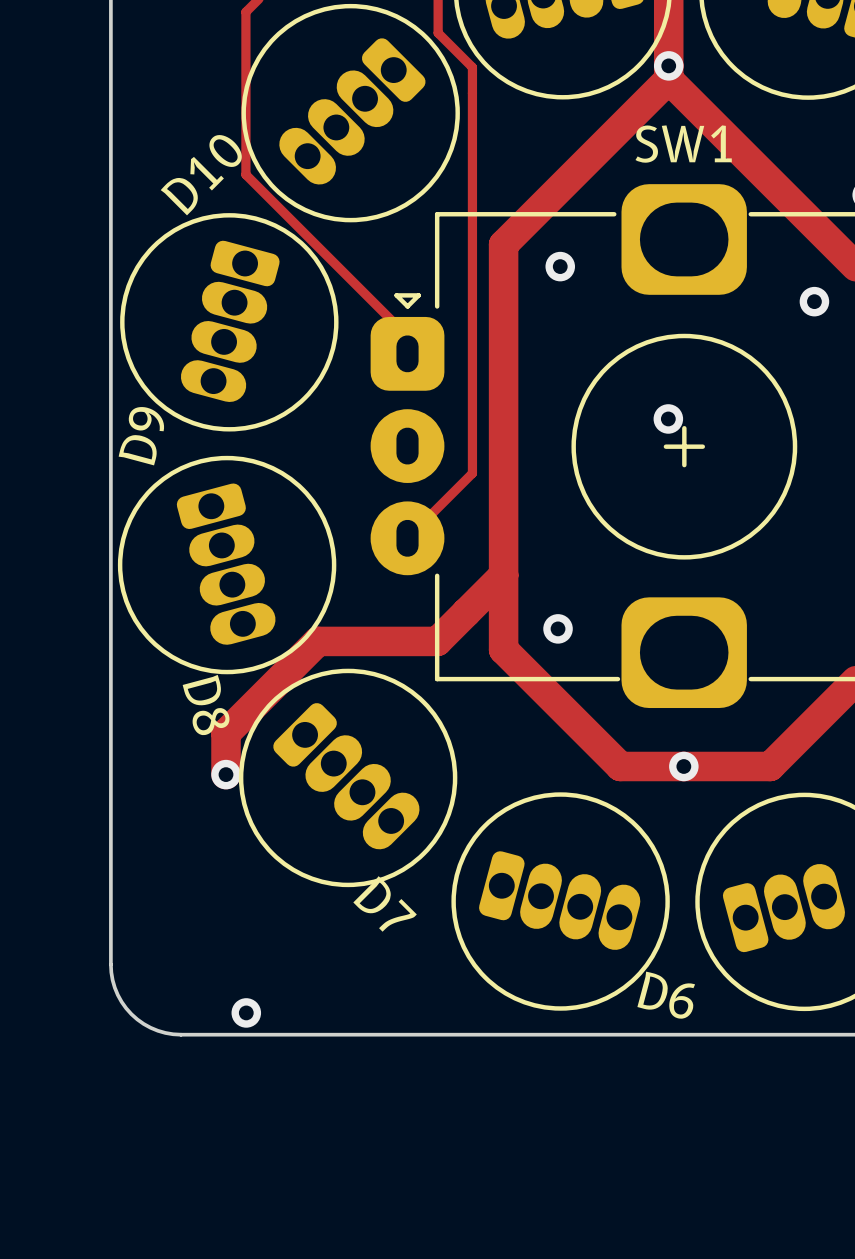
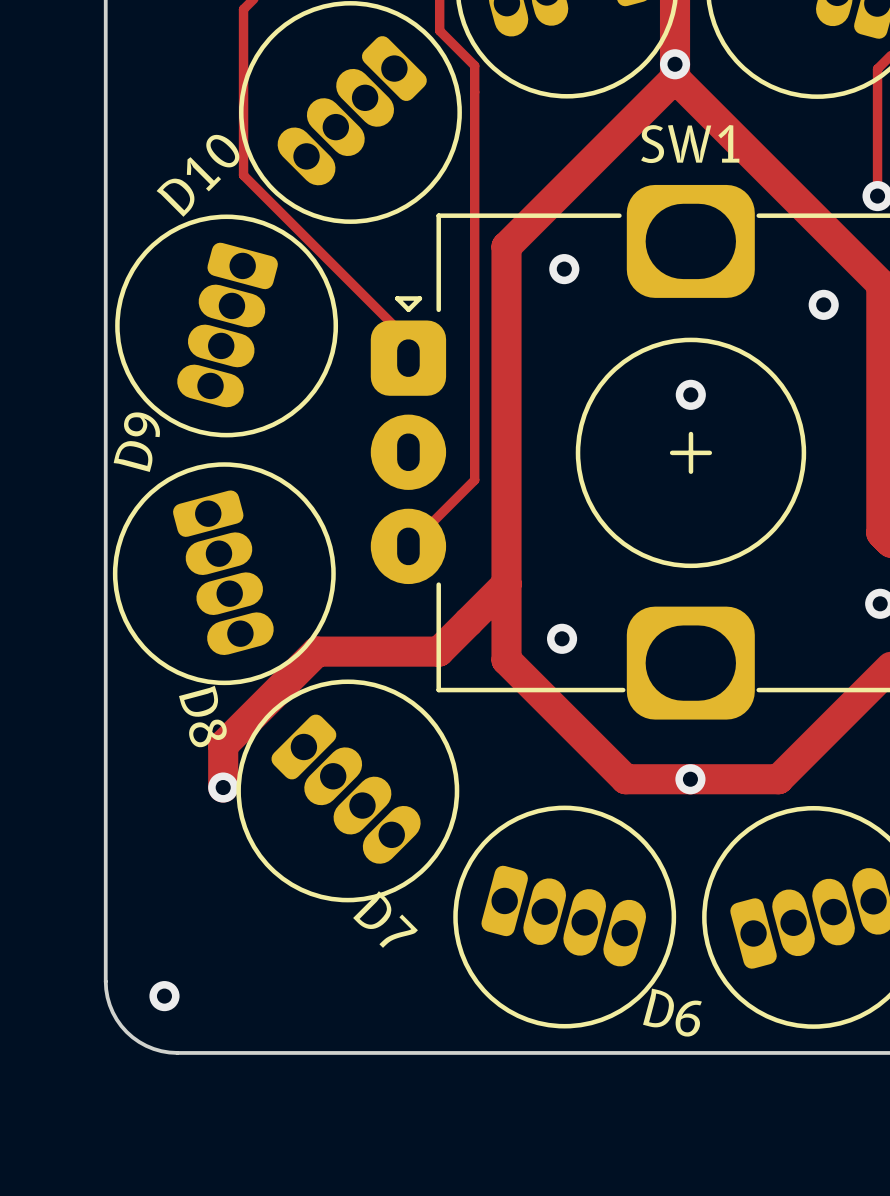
via position: (668, 418) -> (690, 394)
via position: (246, 1012) -> (164, 996)

